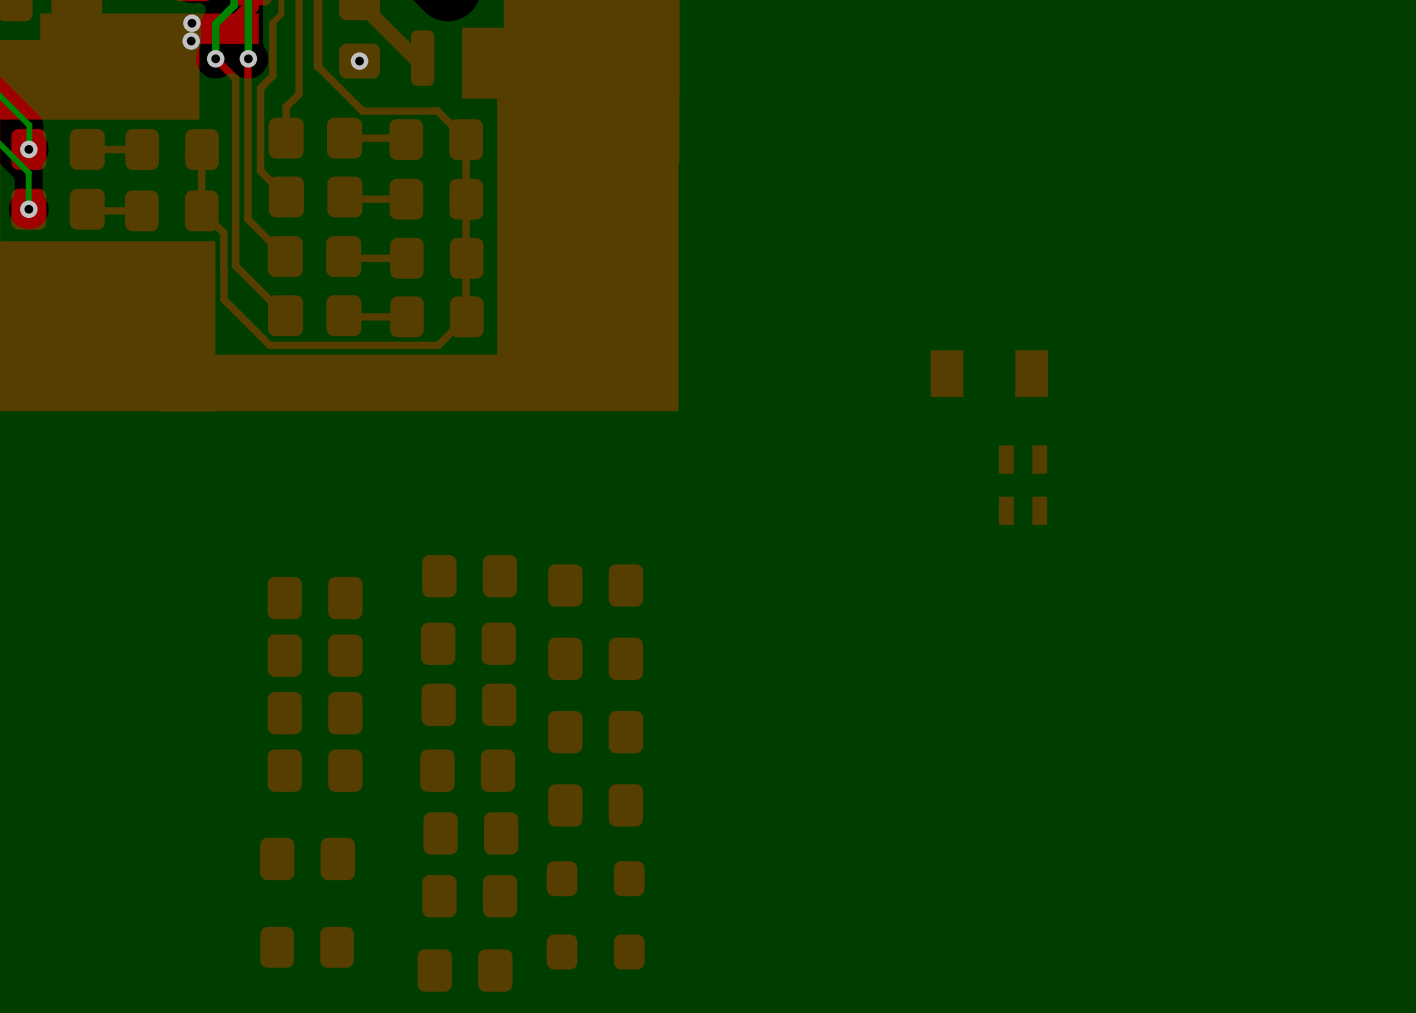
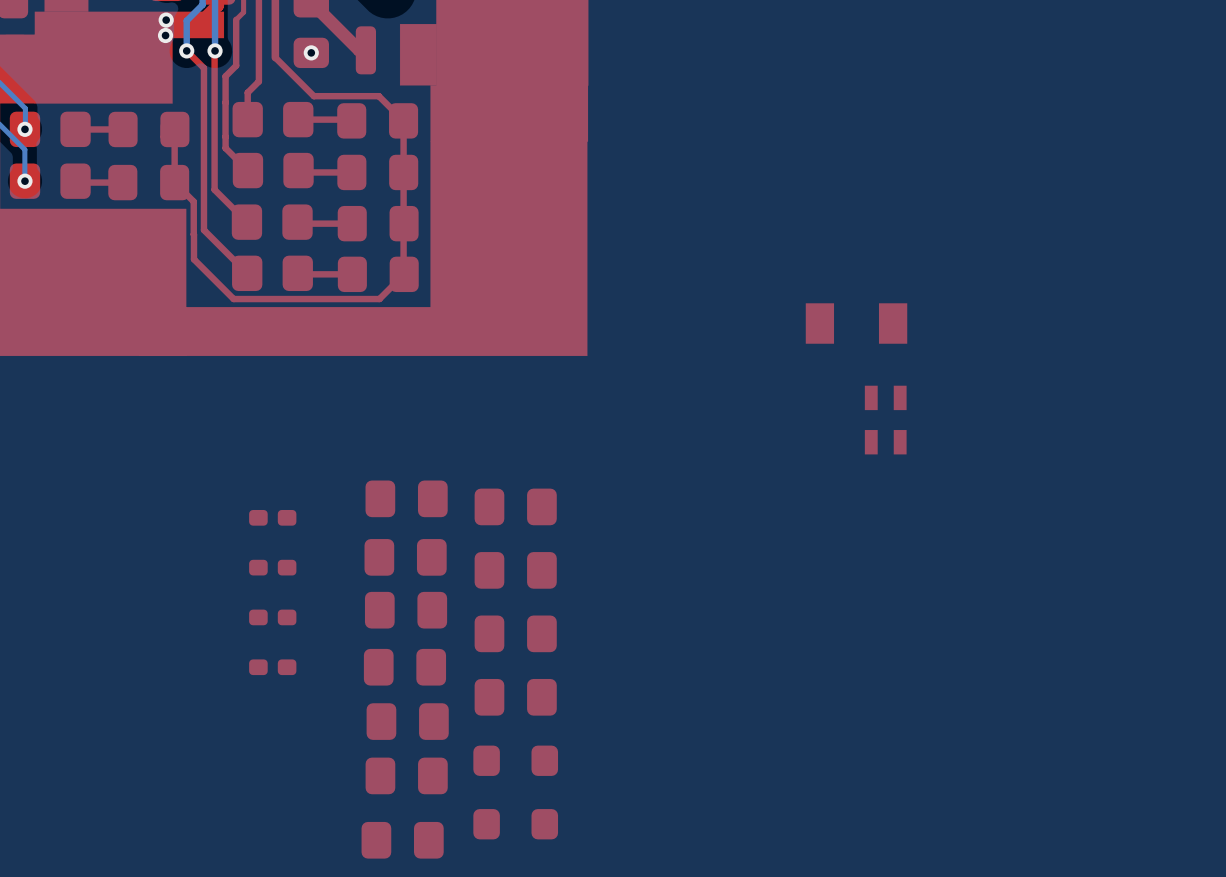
part footprint: [267, 576, 363, 620] -> [249, 509, 297, 526]
part footprint: [267, 634, 363, 677] -> [249, 559, 297, 576]
part footprint: [267, 691, 363, 735] -> [249, 609, 297, 626]
part footprint: [267, 749, 363, 792] -> [249, 659, 297, 676]
part: (307, 858) -> none
part: (307, 947) -> none

